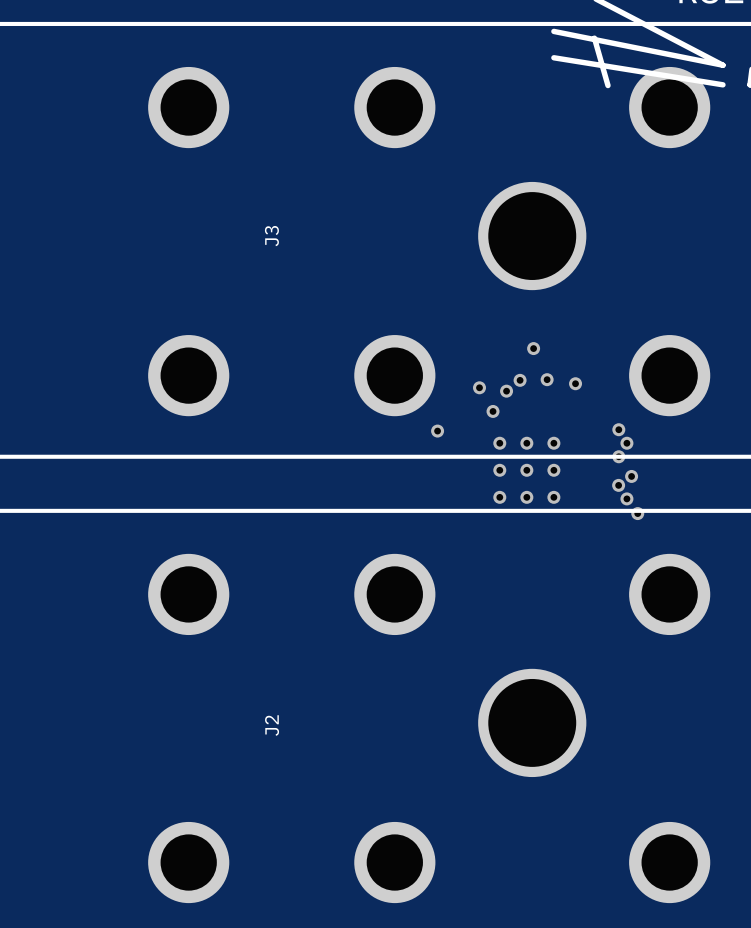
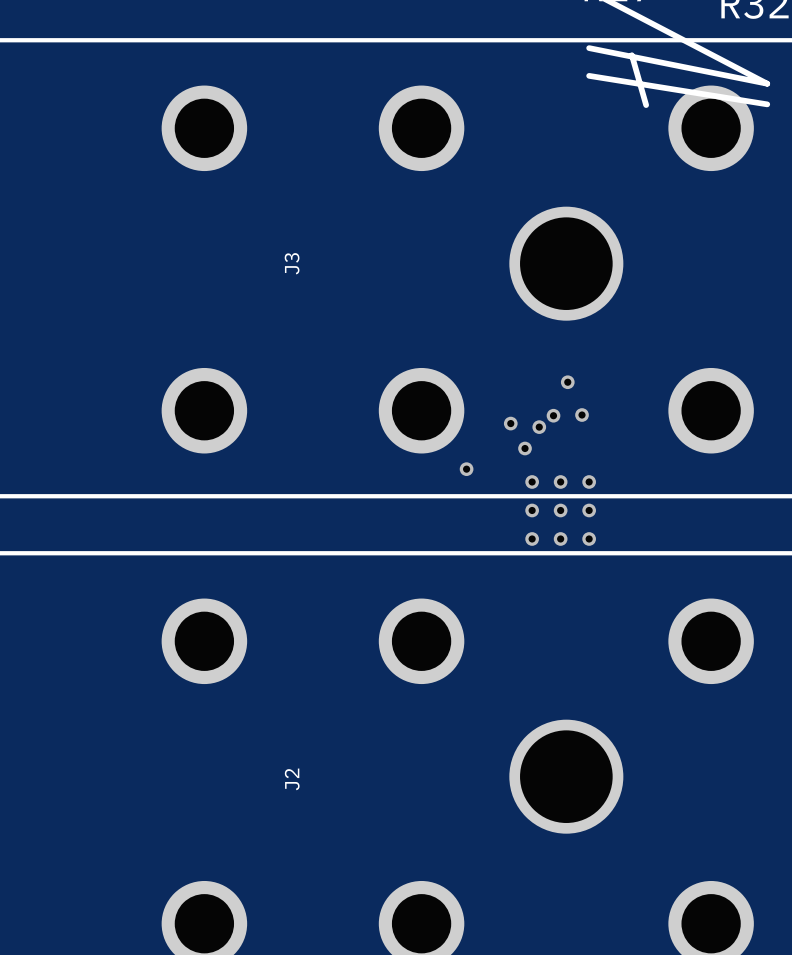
via: (575, 383) -> none
via: (618, 429) -> none
via: (626, 443) -> none
via: (618, 456) -> none
via: (631, 476) -> none
via: (618, 485) -> none
via: (626, 498) -> none
via: (637, 513) -> none

